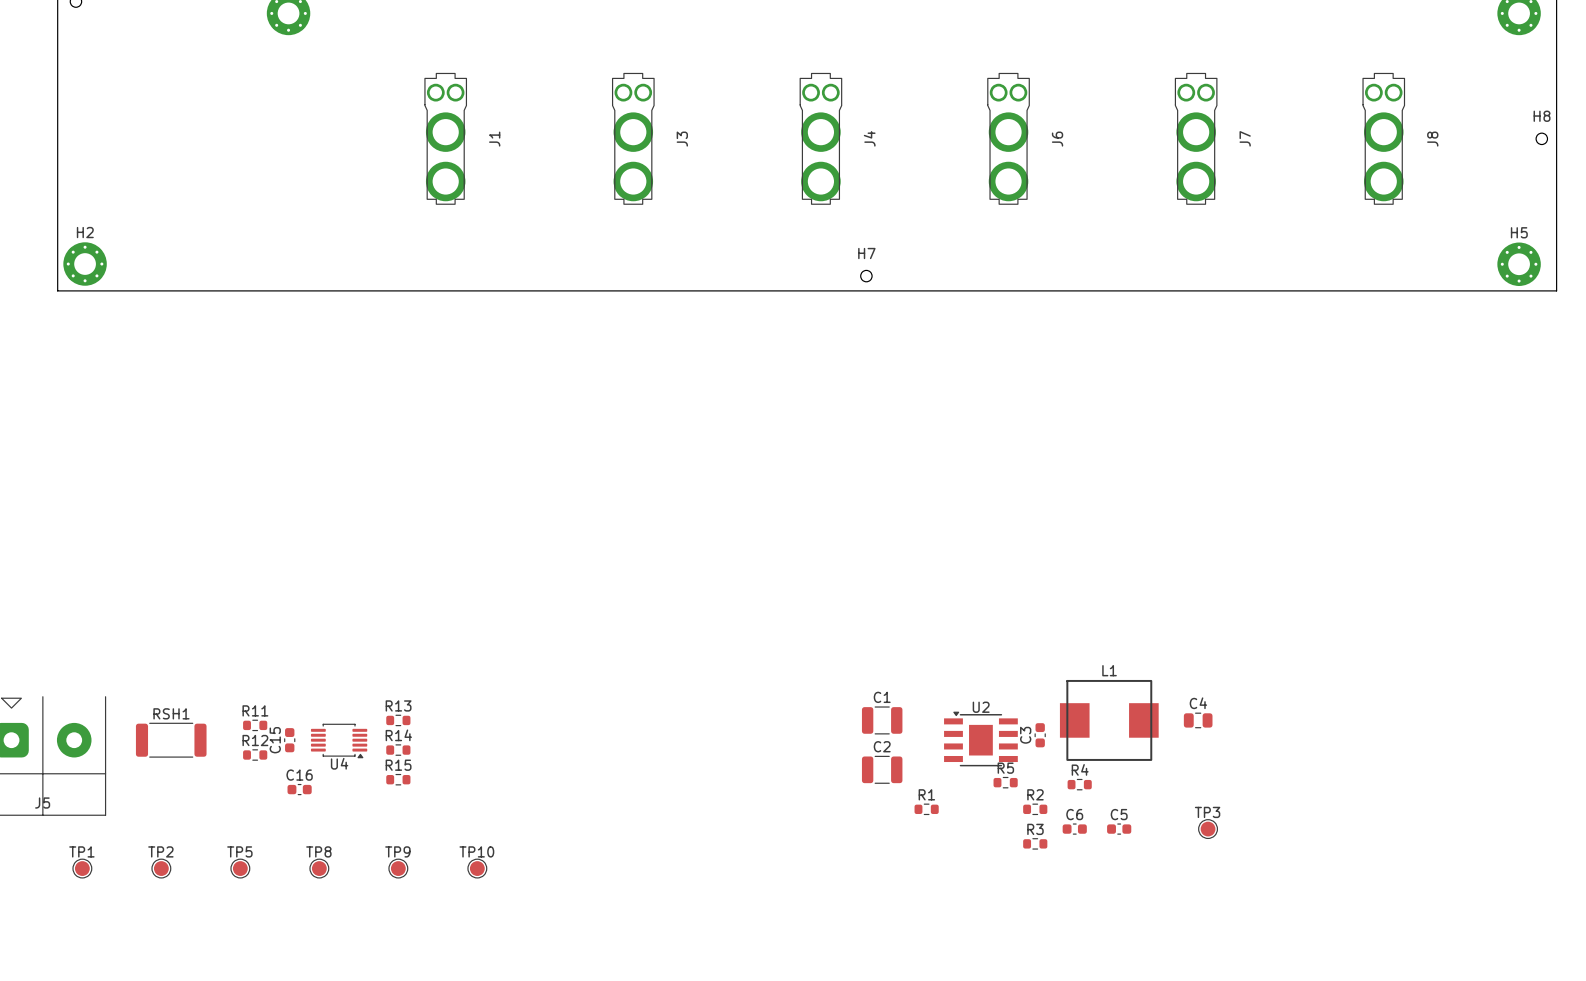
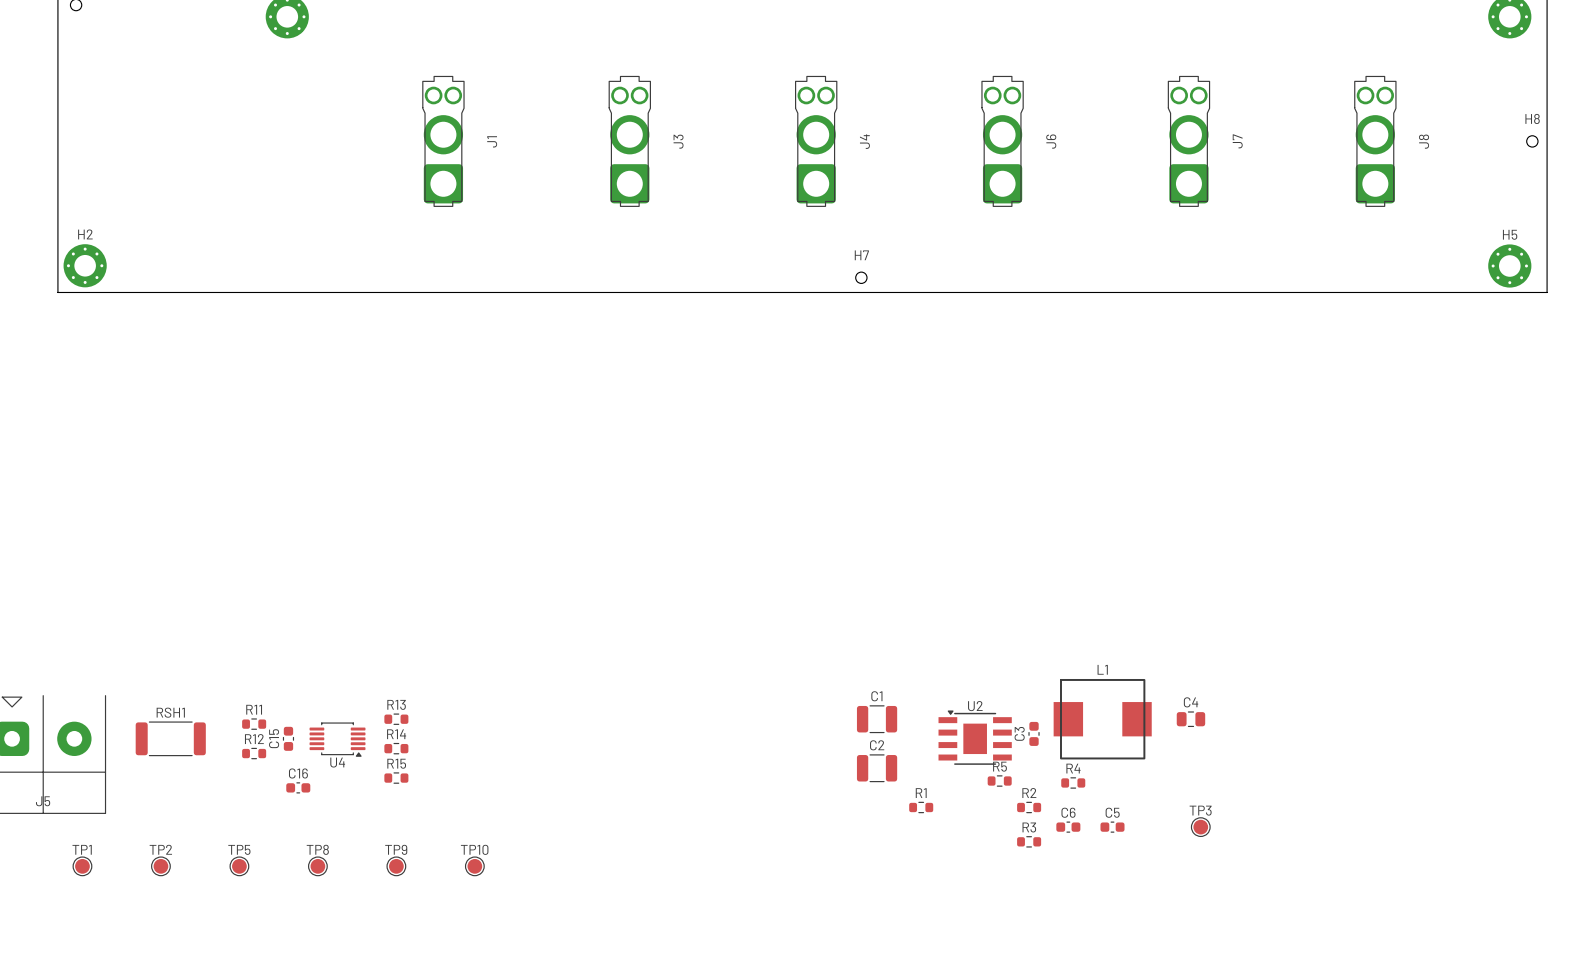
J1 footprint: [424, 72, 468, 205] -> [422, 75, 465, 207]
J3 footprint: [611, 72, 655, 205] -> [608, 75, 651, 207]
J4 footprint: [799, 72, 843, 205] -> [795, 75, 838, 207]
J6 footprint: [987, 72, 1030, 205] -> [981, 75, 1024, 207]
J7 footprint: [1174, 72, 1218, 205] -> [1167, 75, 1211, 207]
J8 footprint: [1362, 72, 1406, 205] -> [1354, 75, 1397, 207]

